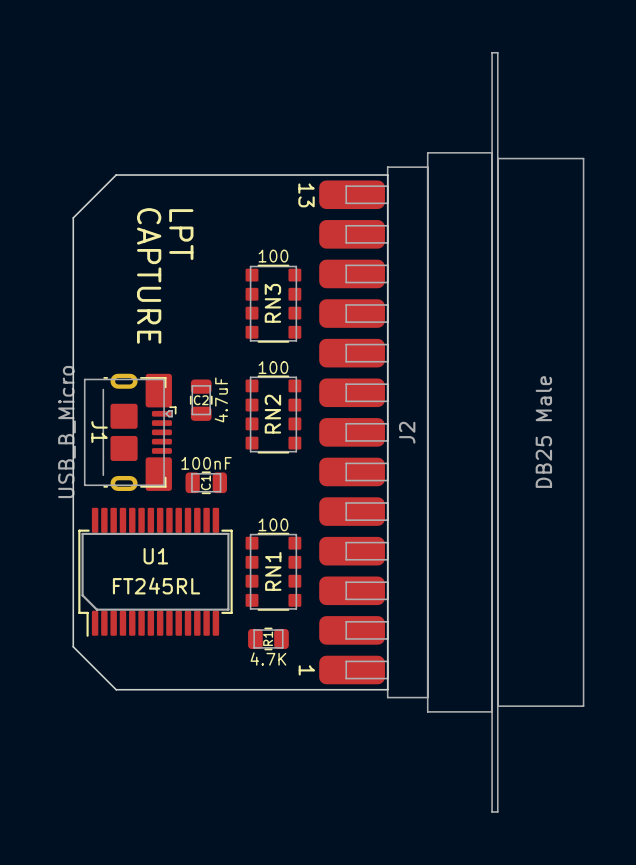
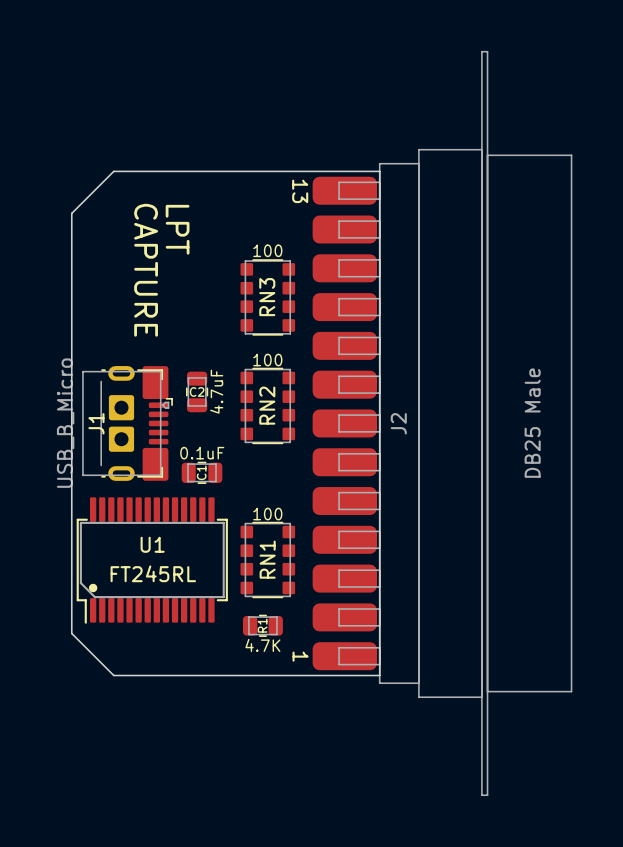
J1 footprint: [84, 373, 177, 491] -> [82, 366, 173, 481]
C1 value: 100nF (206, 463) -> 0.1uF (202, 453)
U1 footprint: [78, 507, 233, 637] -> [76, 497, 228, 624]

